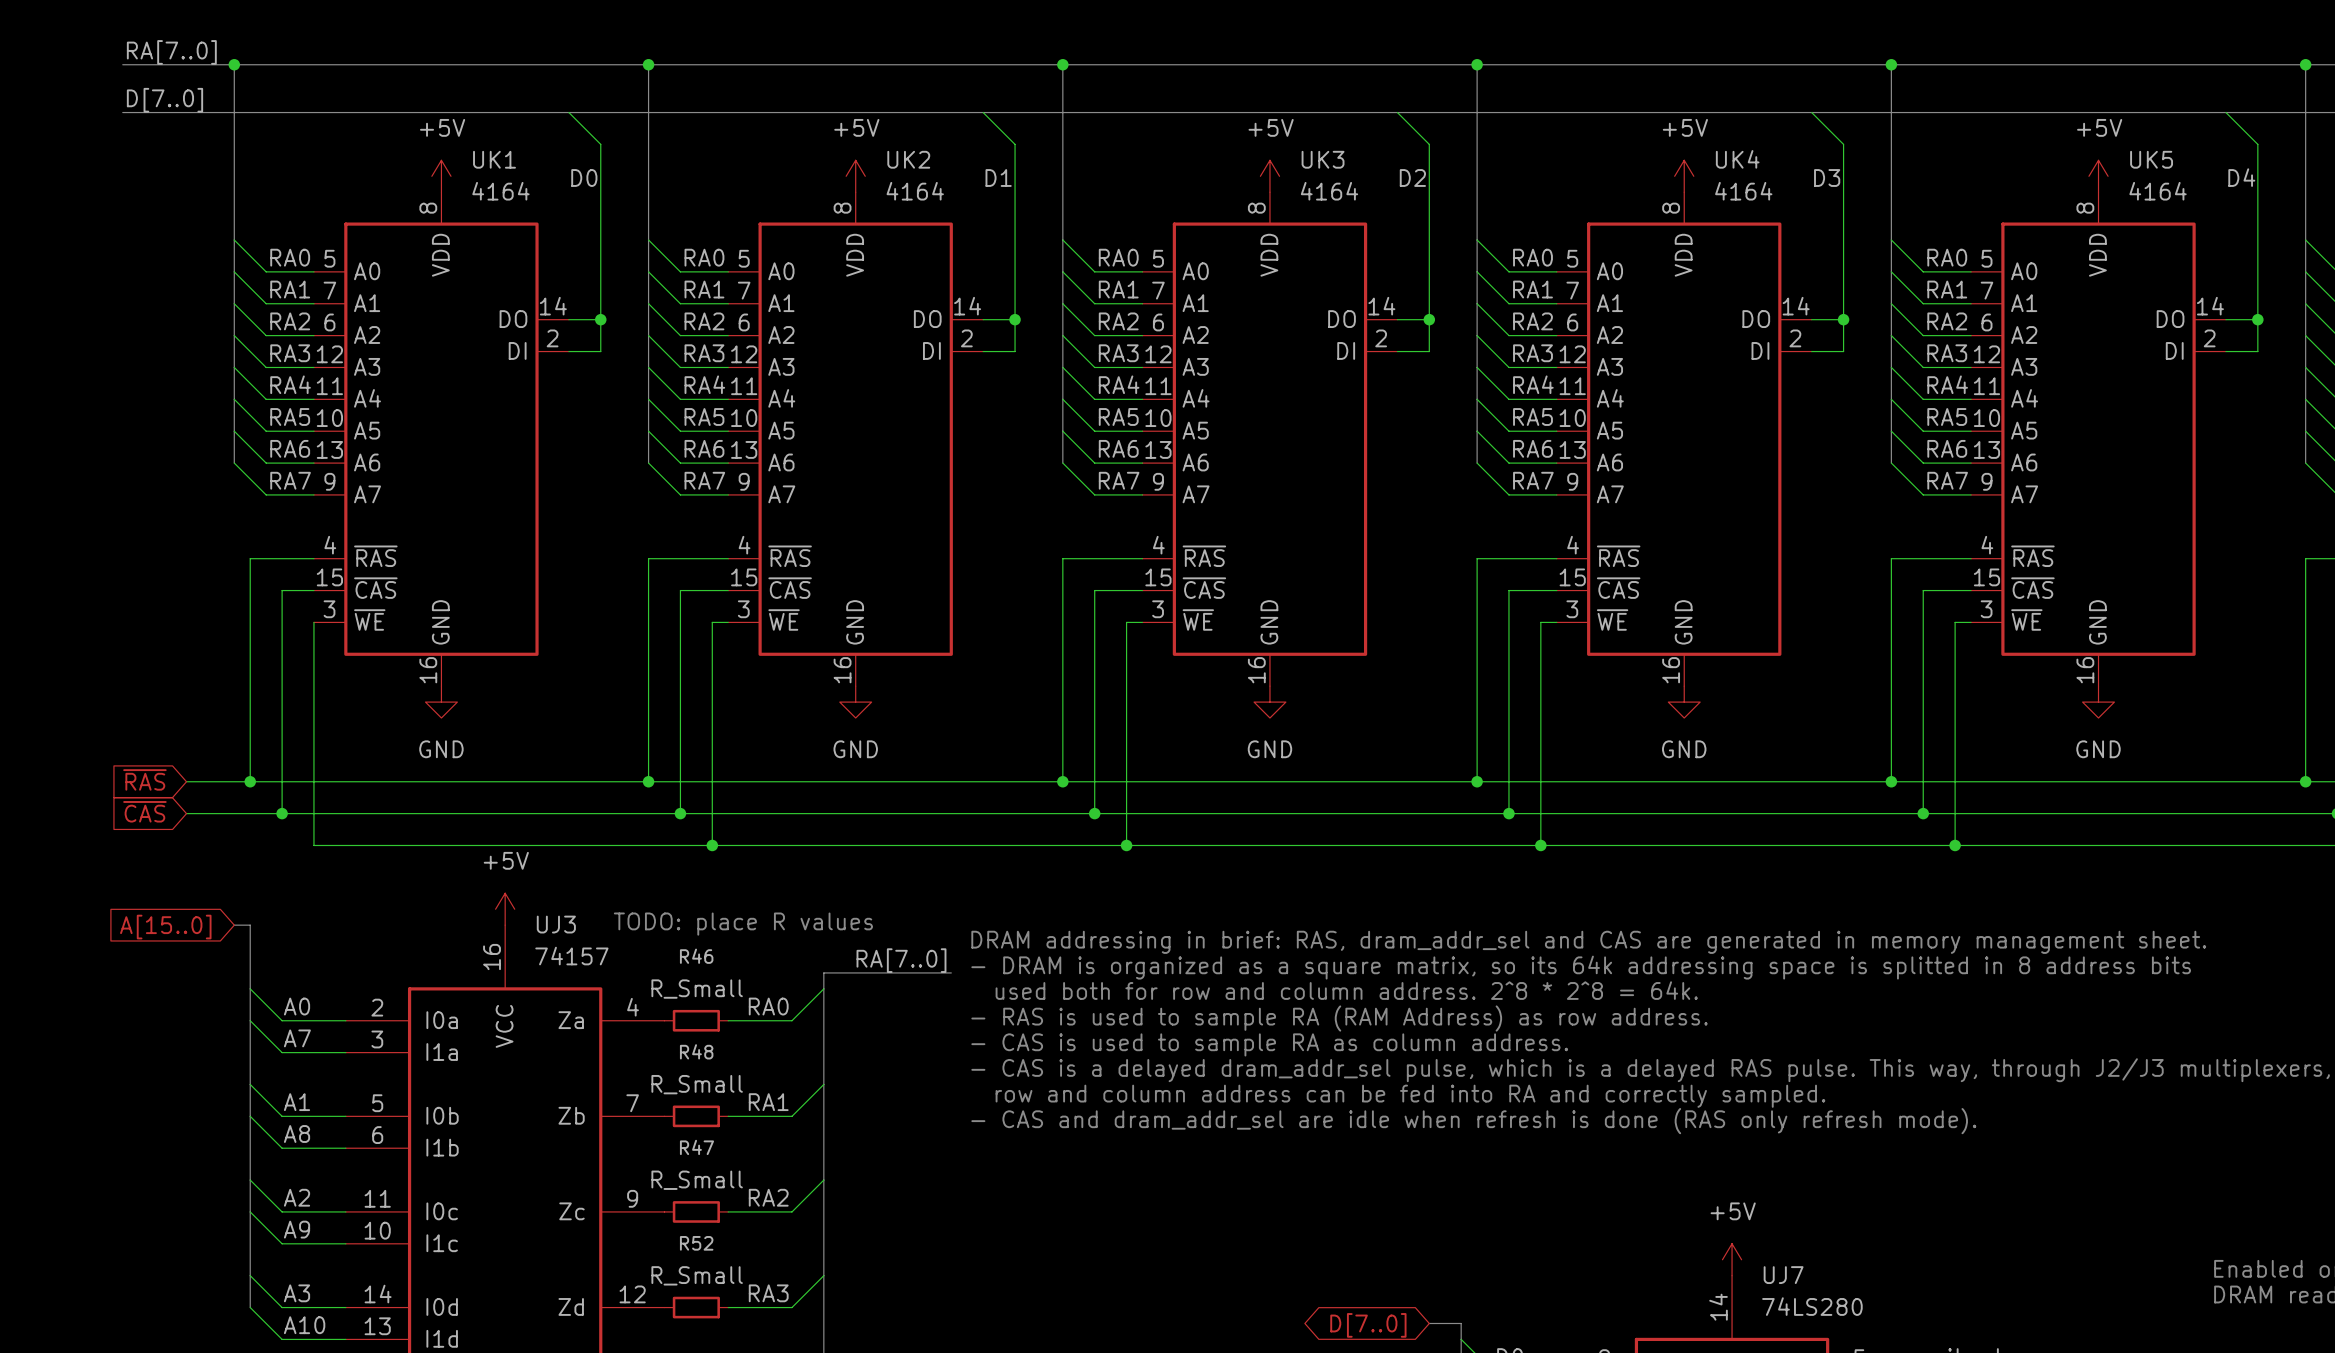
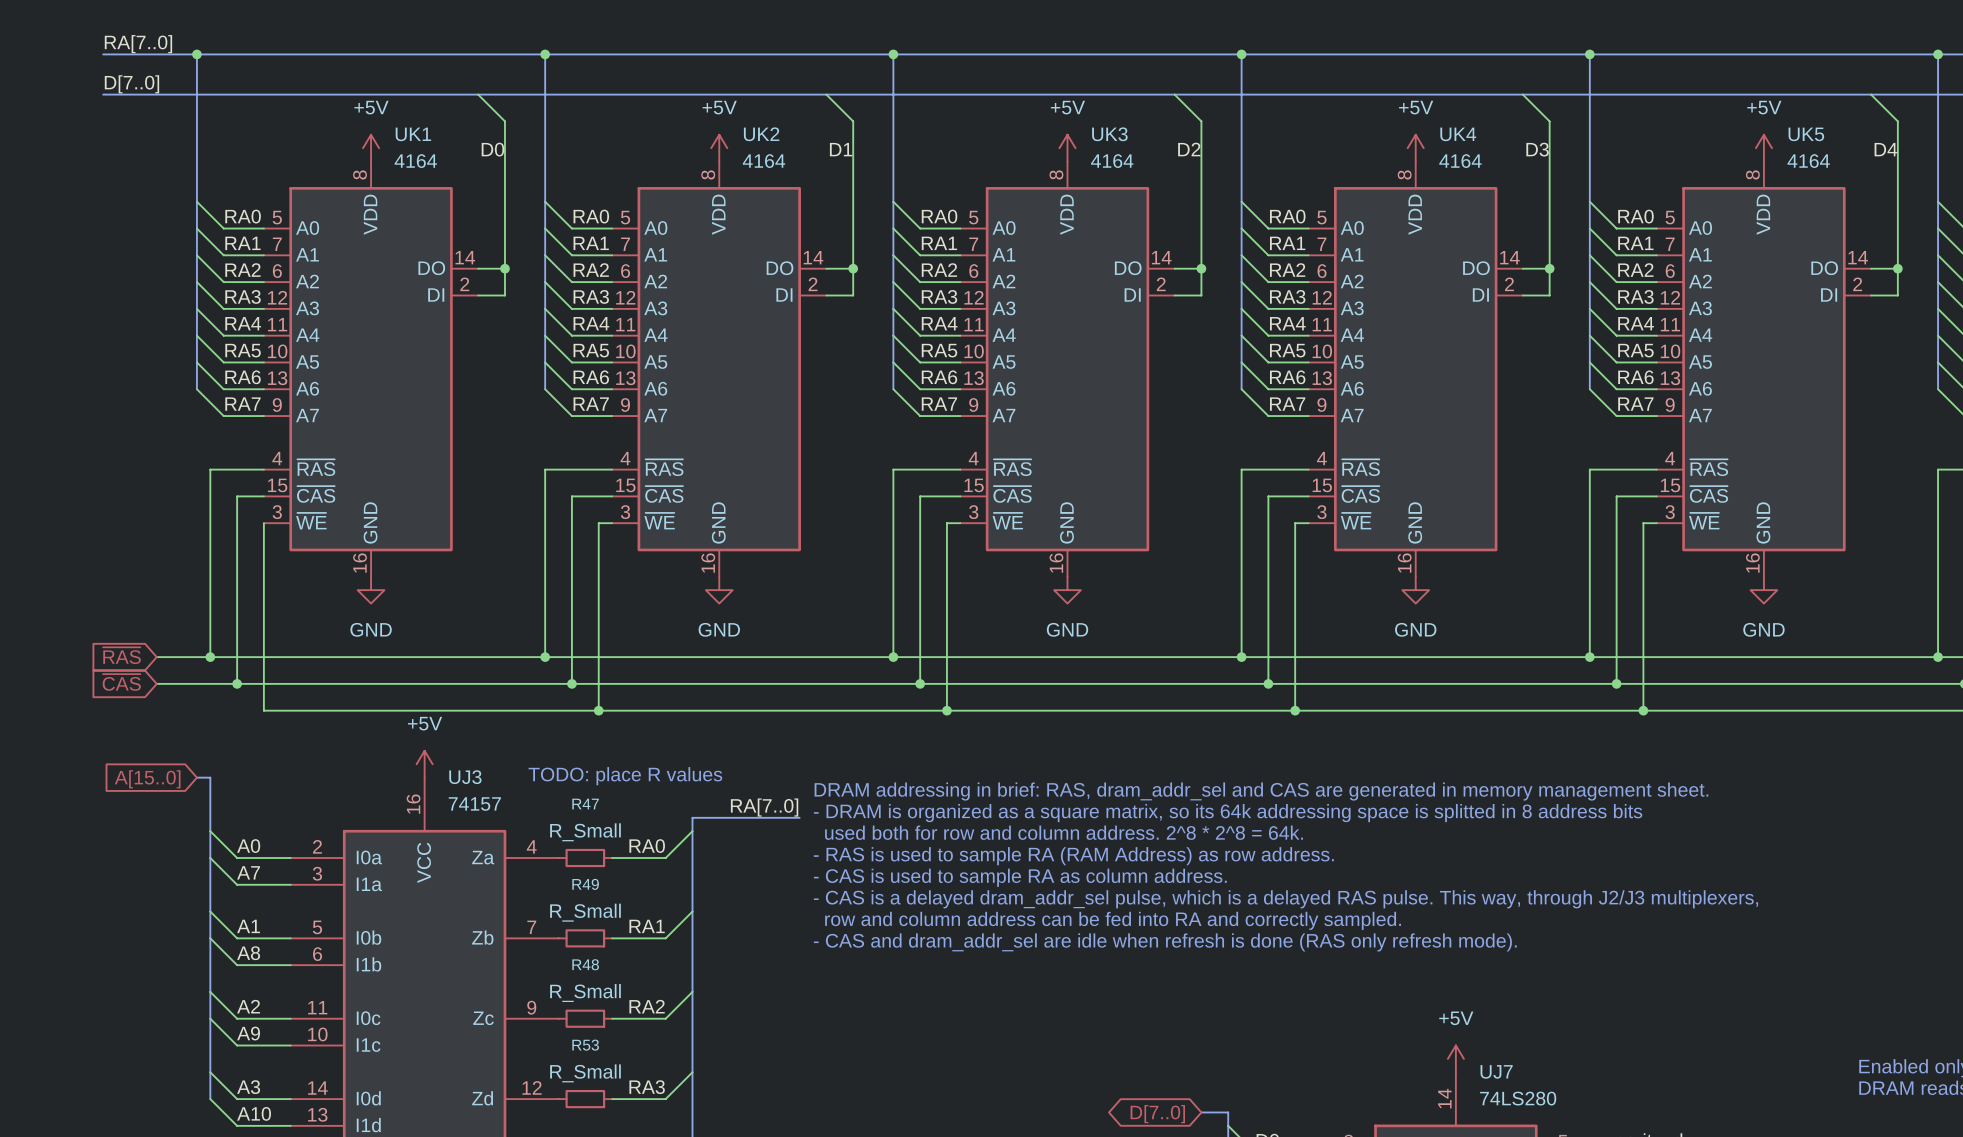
R46 name: R46 (696, 956) -> R47 (585, 804)
R48 name: R48 (696, 1051) -> R49 (585, 884)
R47 name: R47 (696, 1147) -> R48 (585, 964)
R52 name: R52 (696, 1243) -> R53 (585, 1045)

